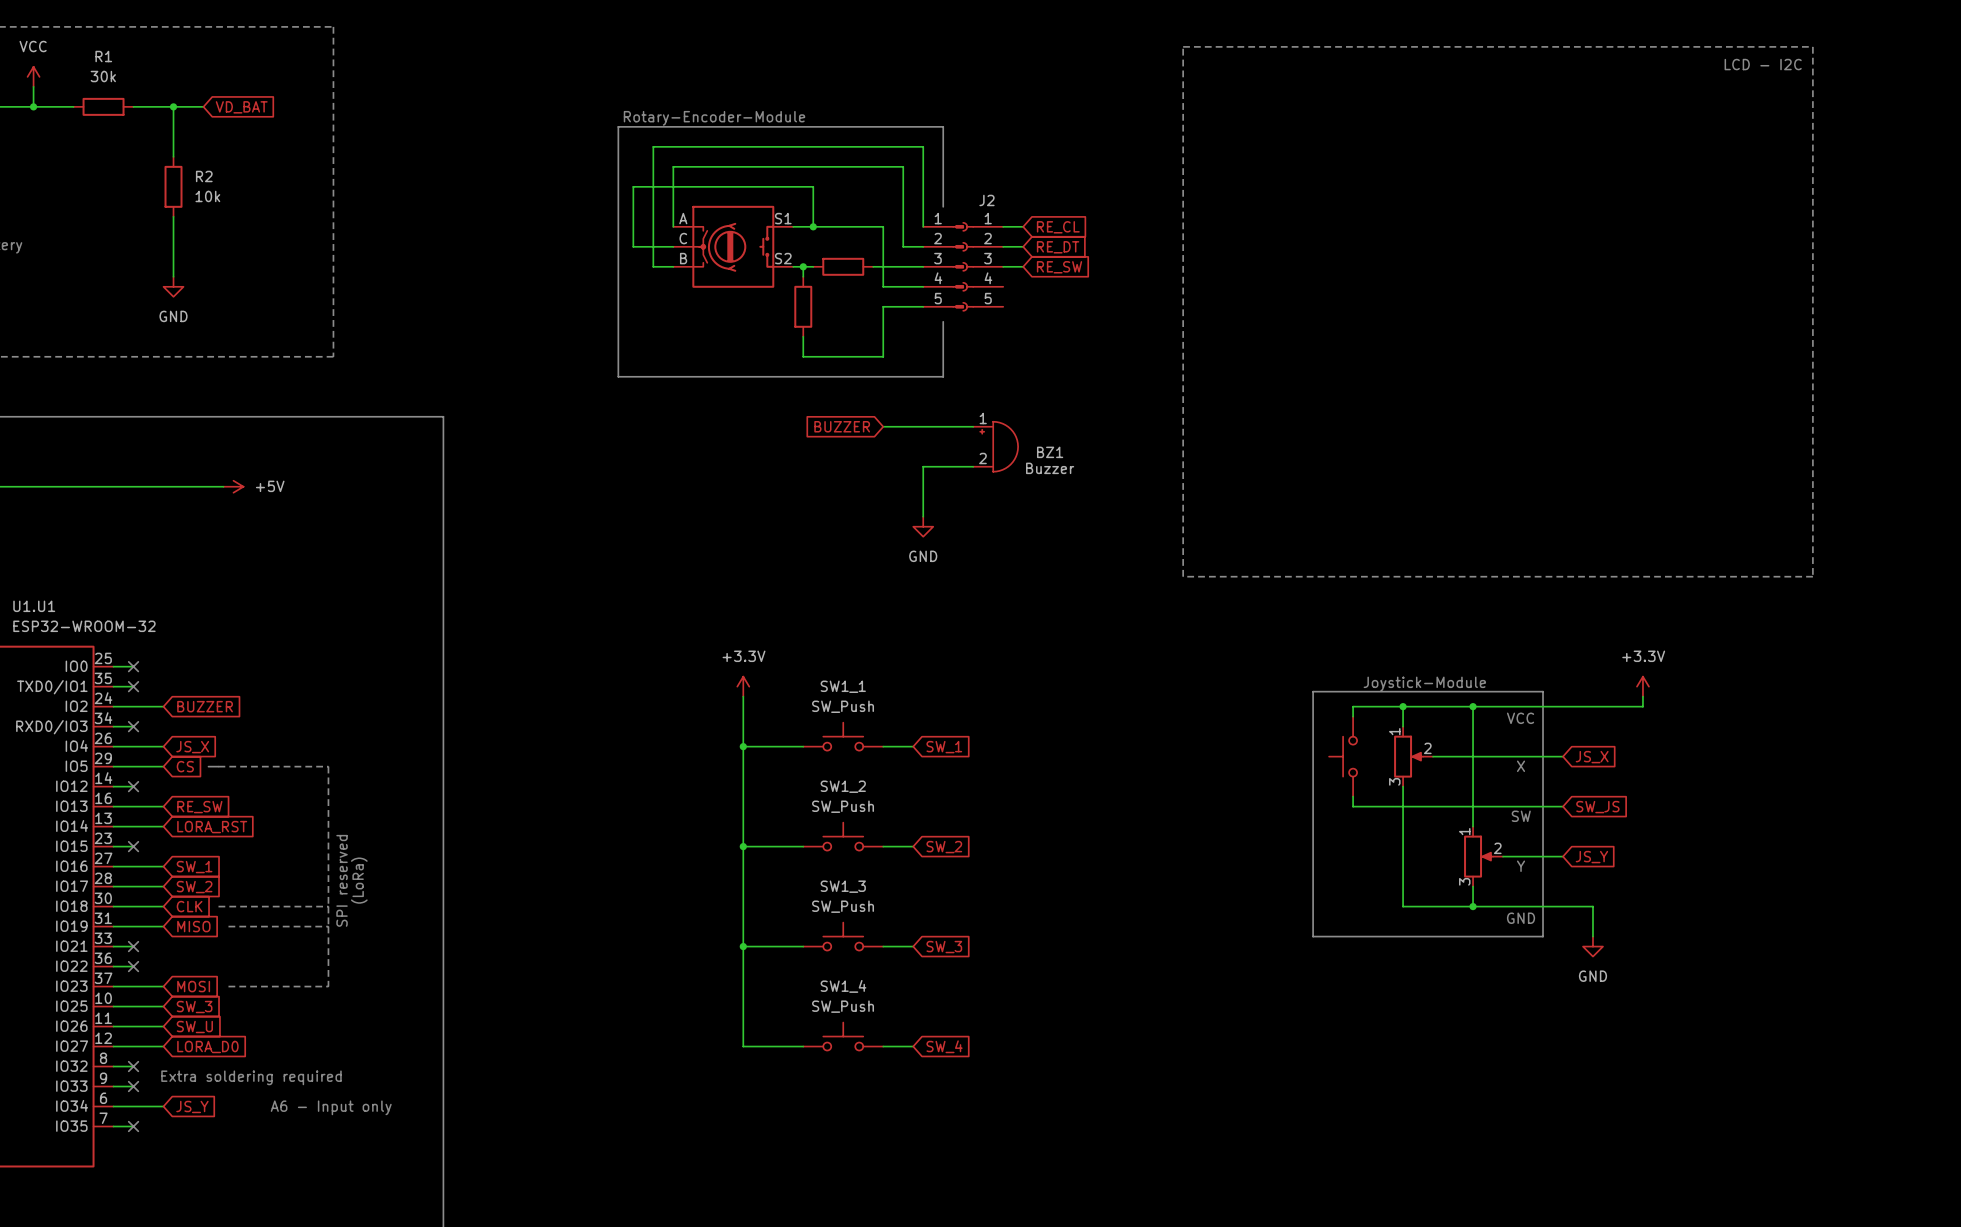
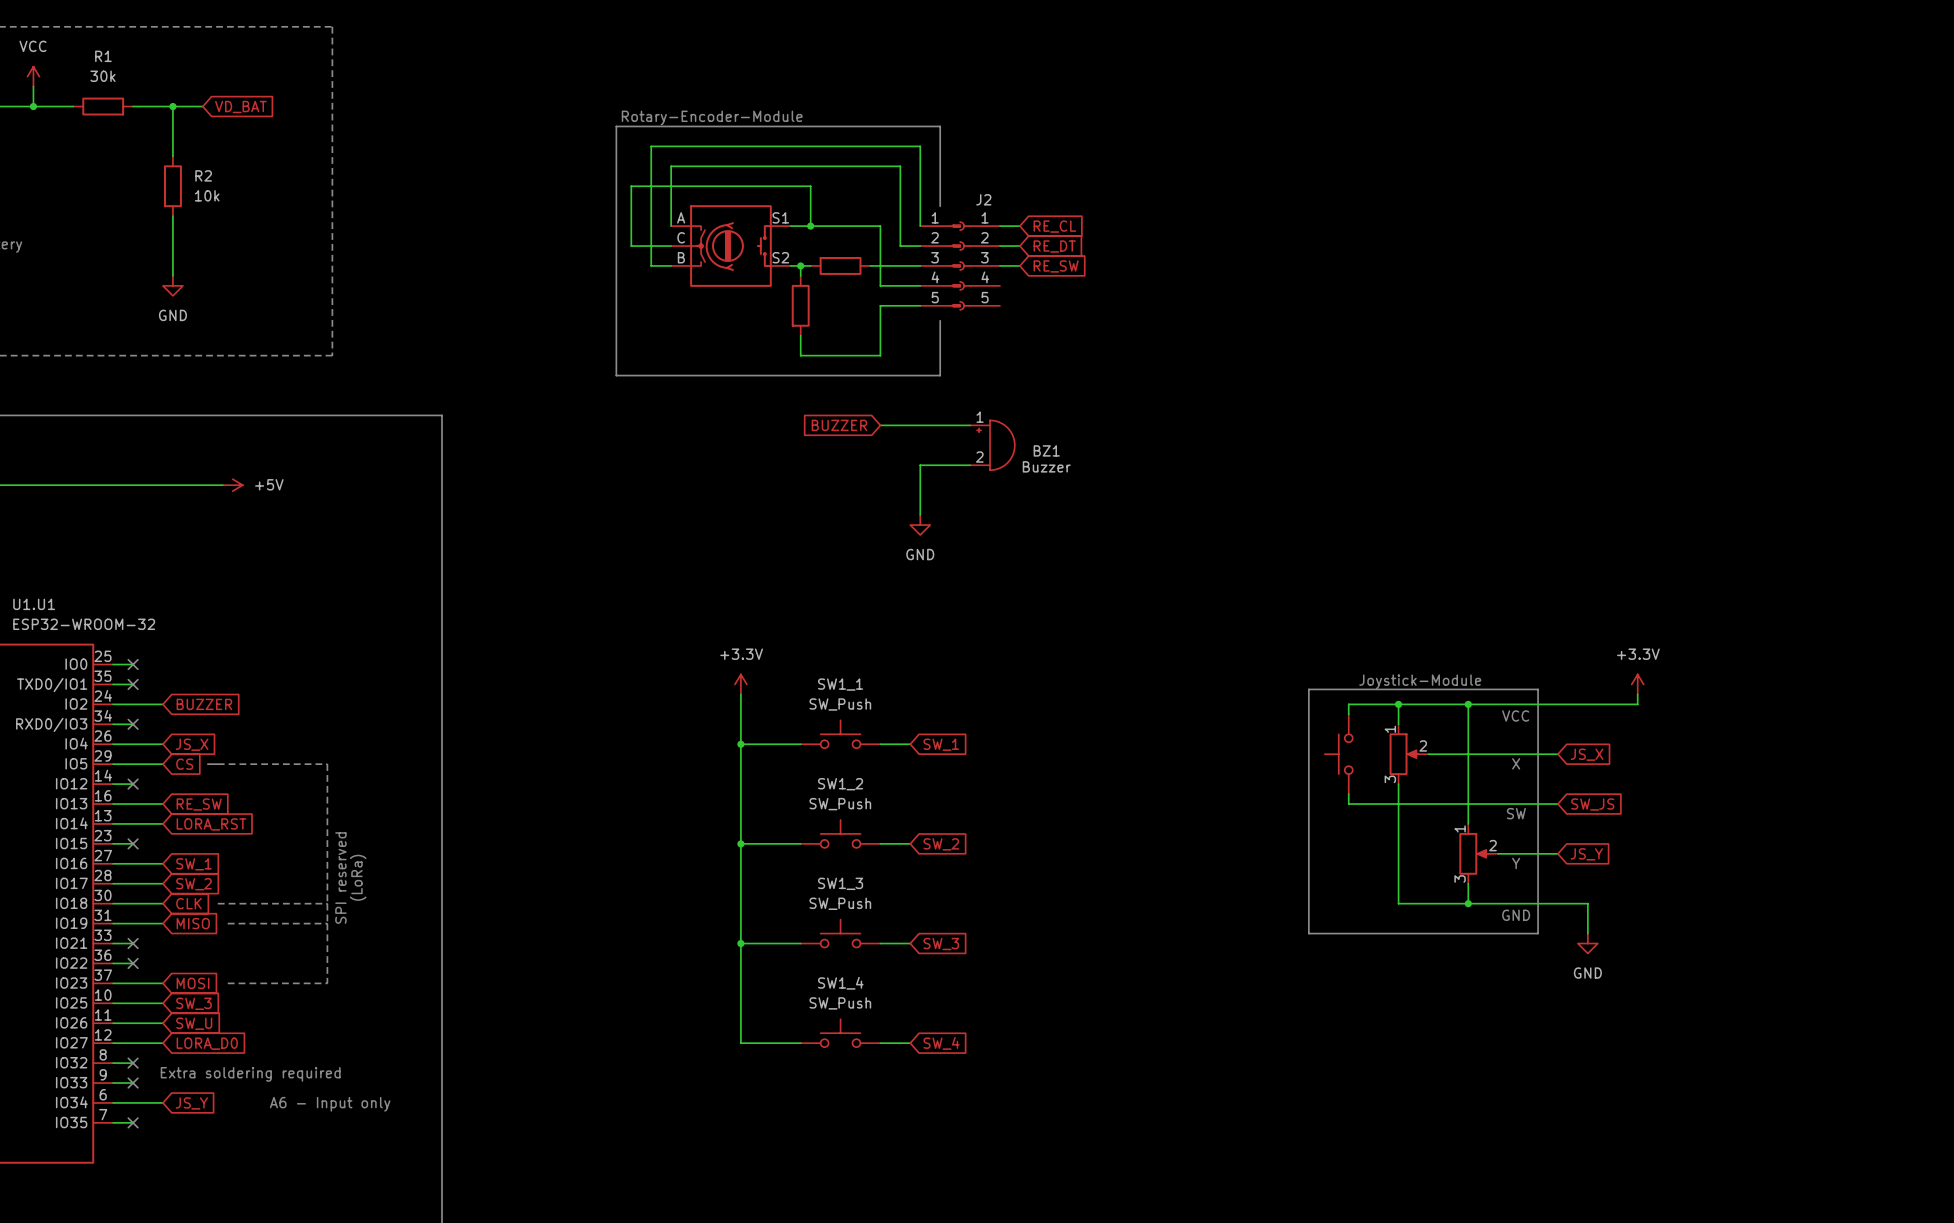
line: (1183, 46) (1812, 46) (1812, 576) (1183, 576) (1183, 46) -> none
text: LCD - I2C (1763, 64) -> none

